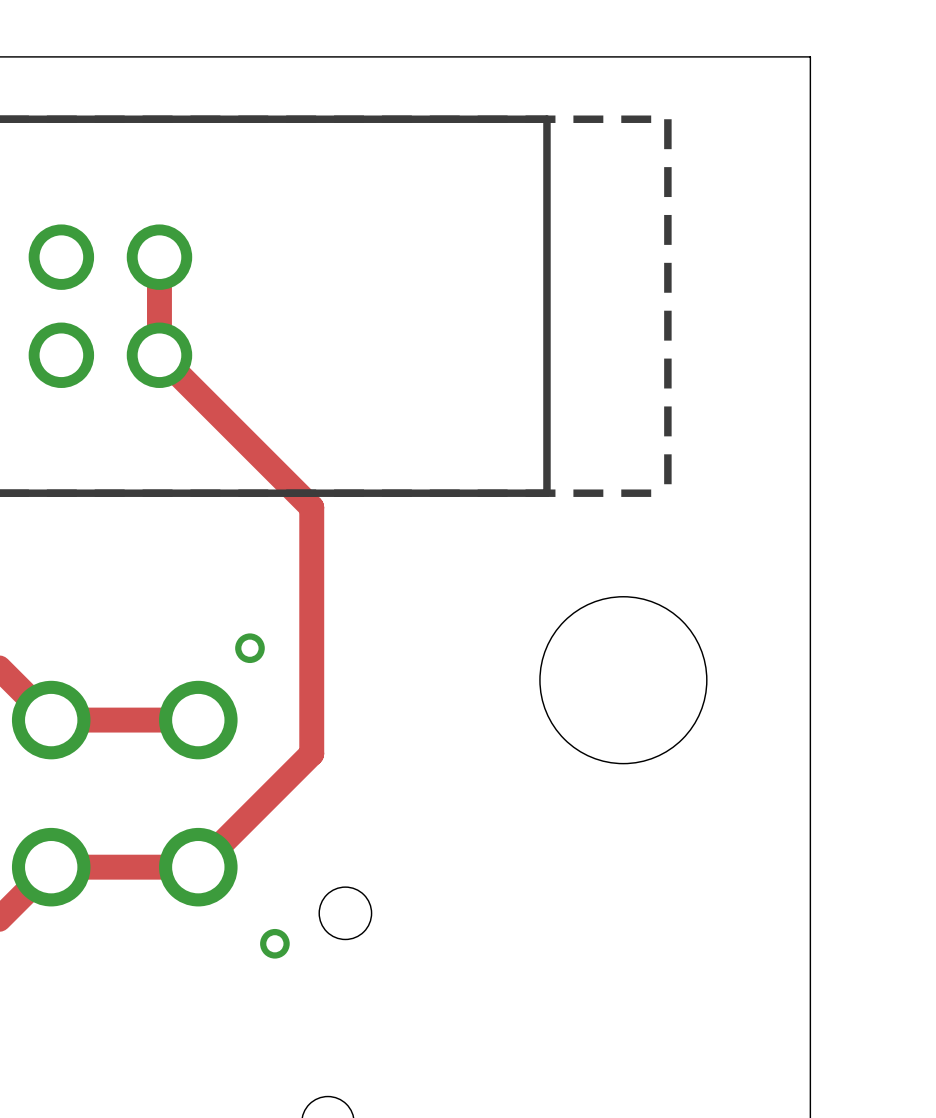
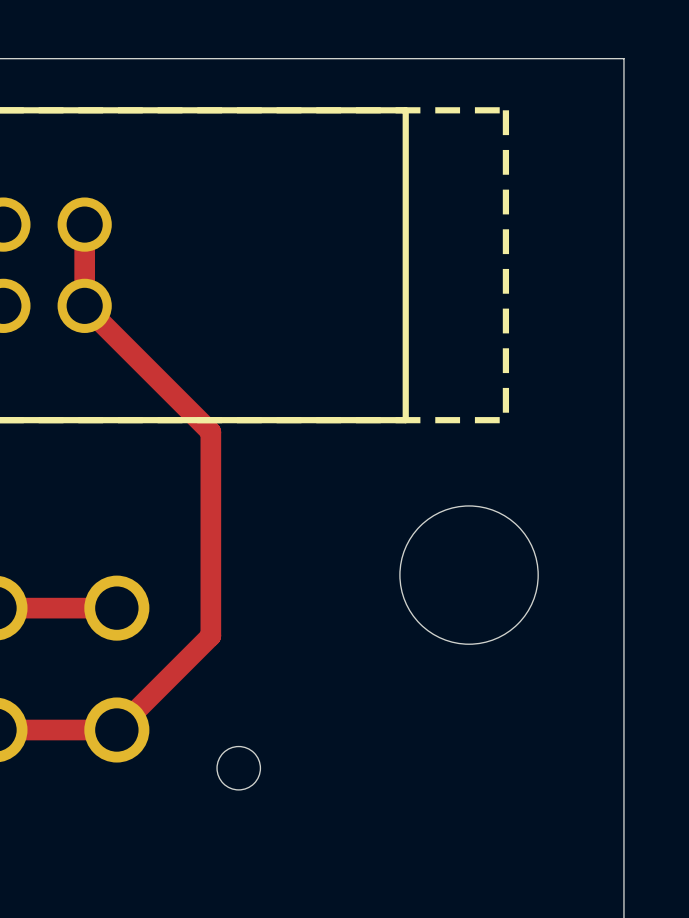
via: (249, 648) -> none
via: (274, 943) -> none

